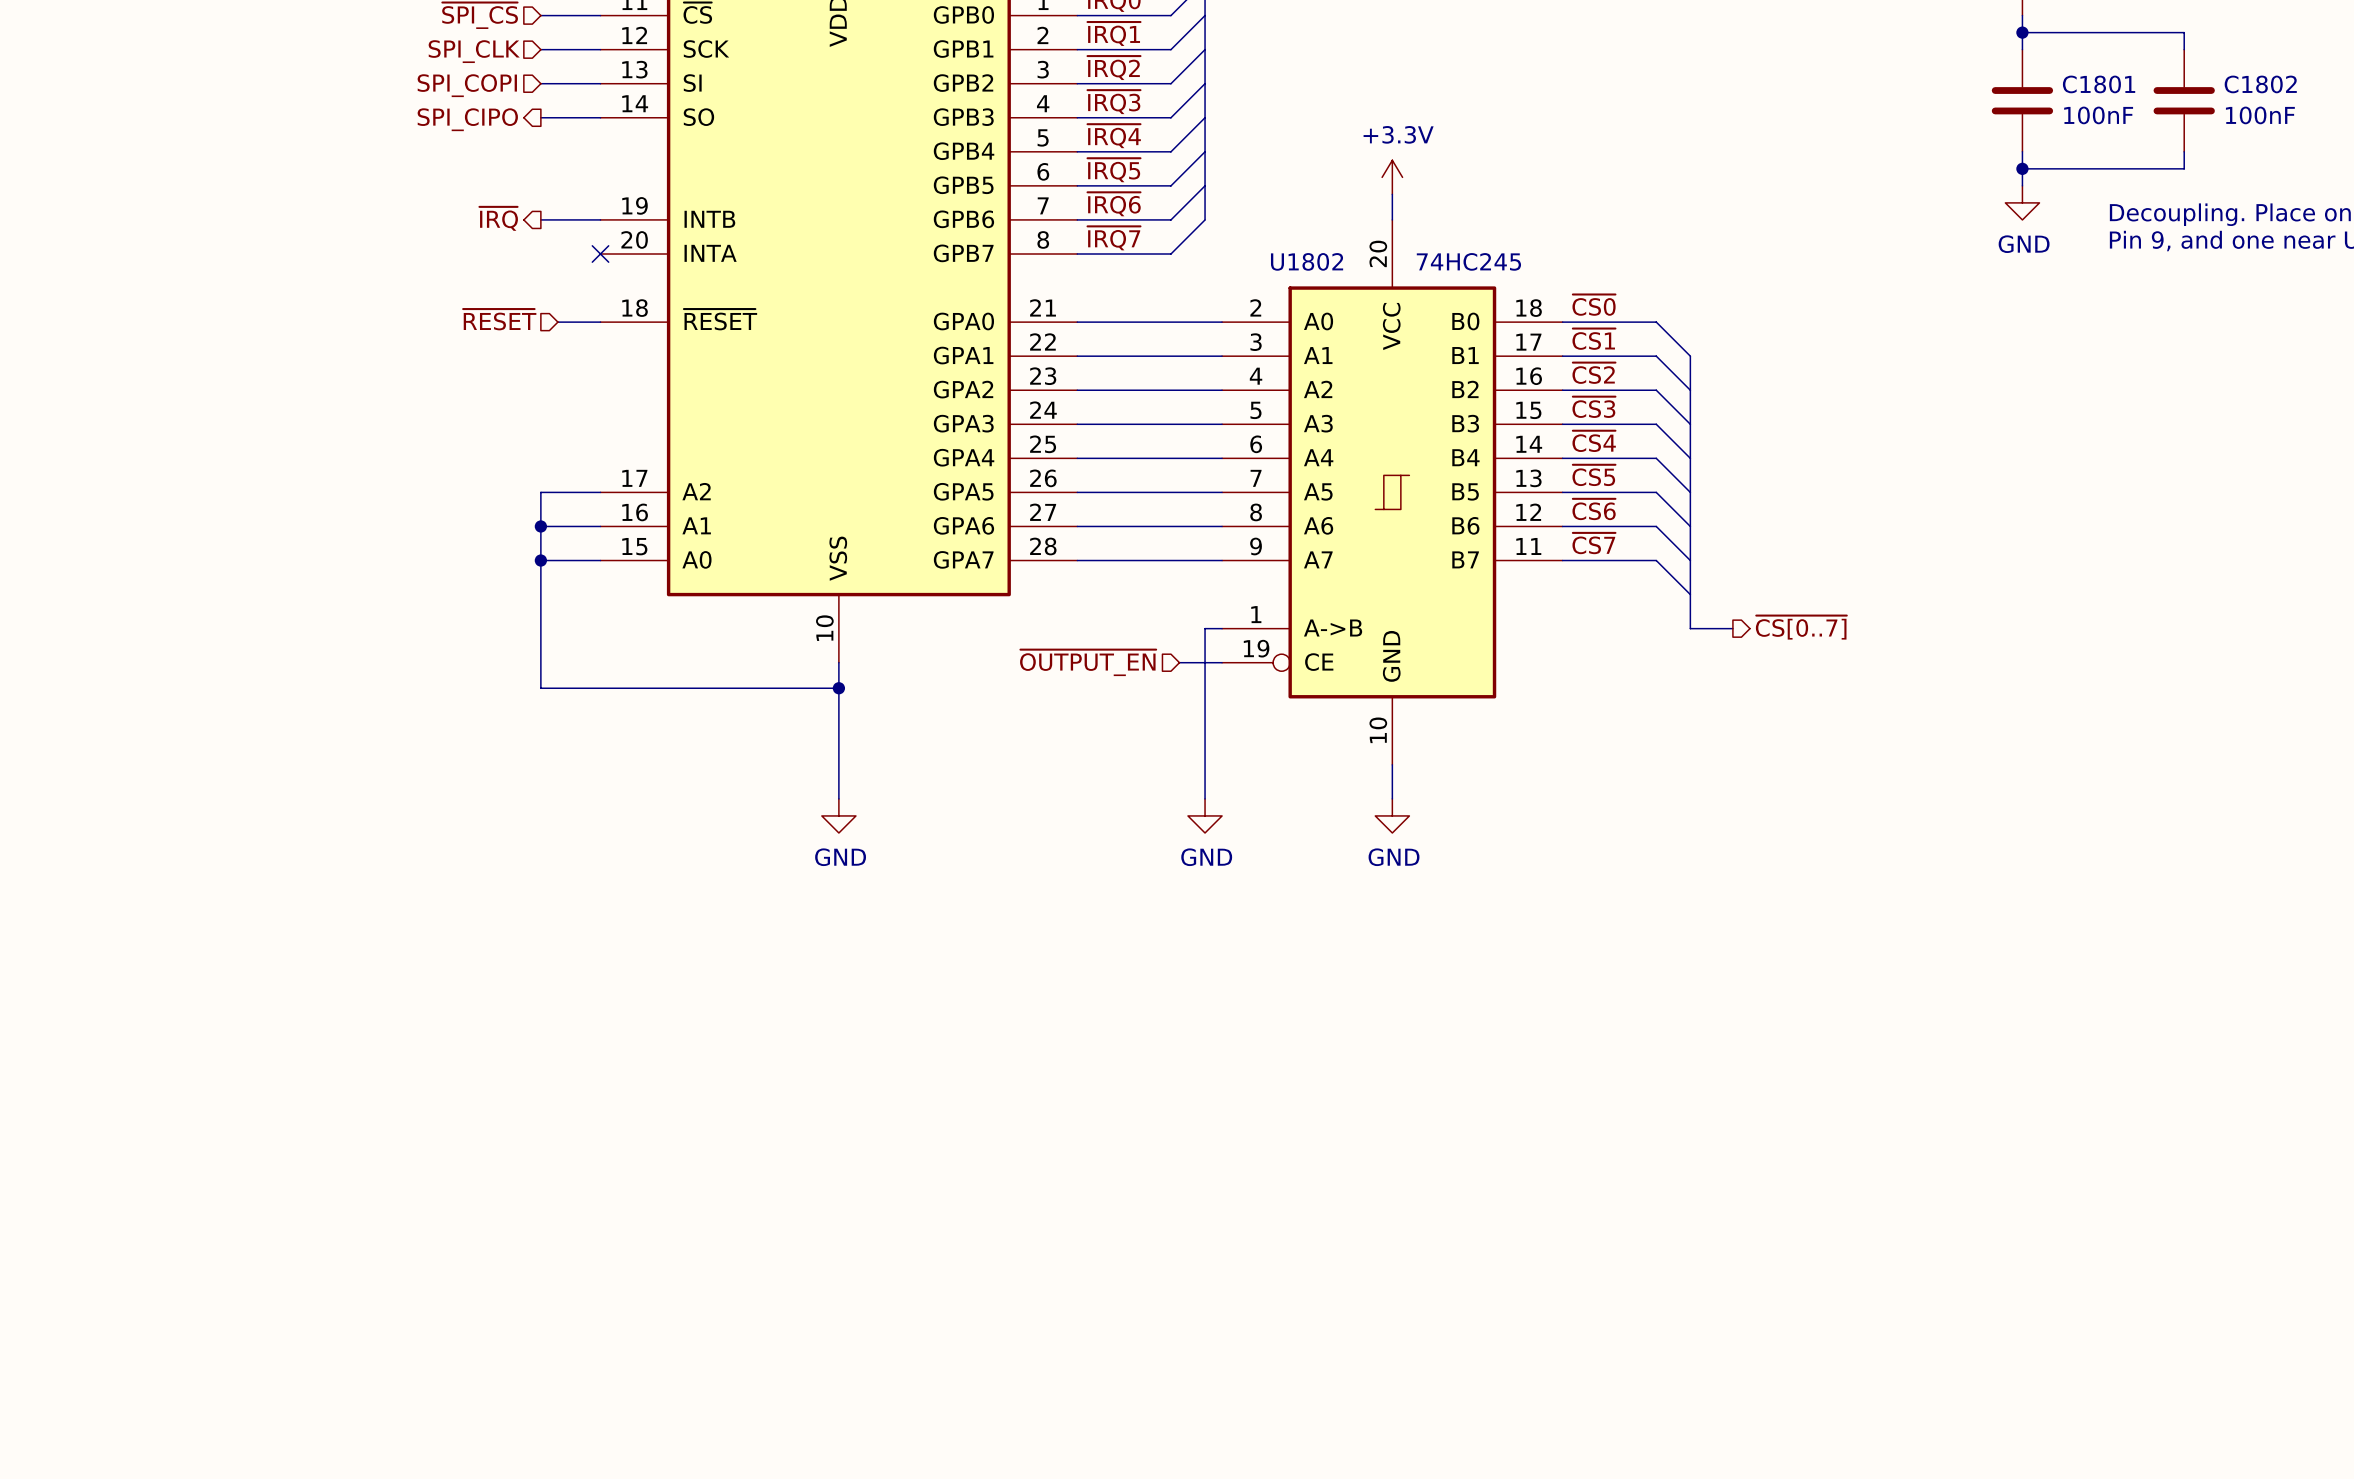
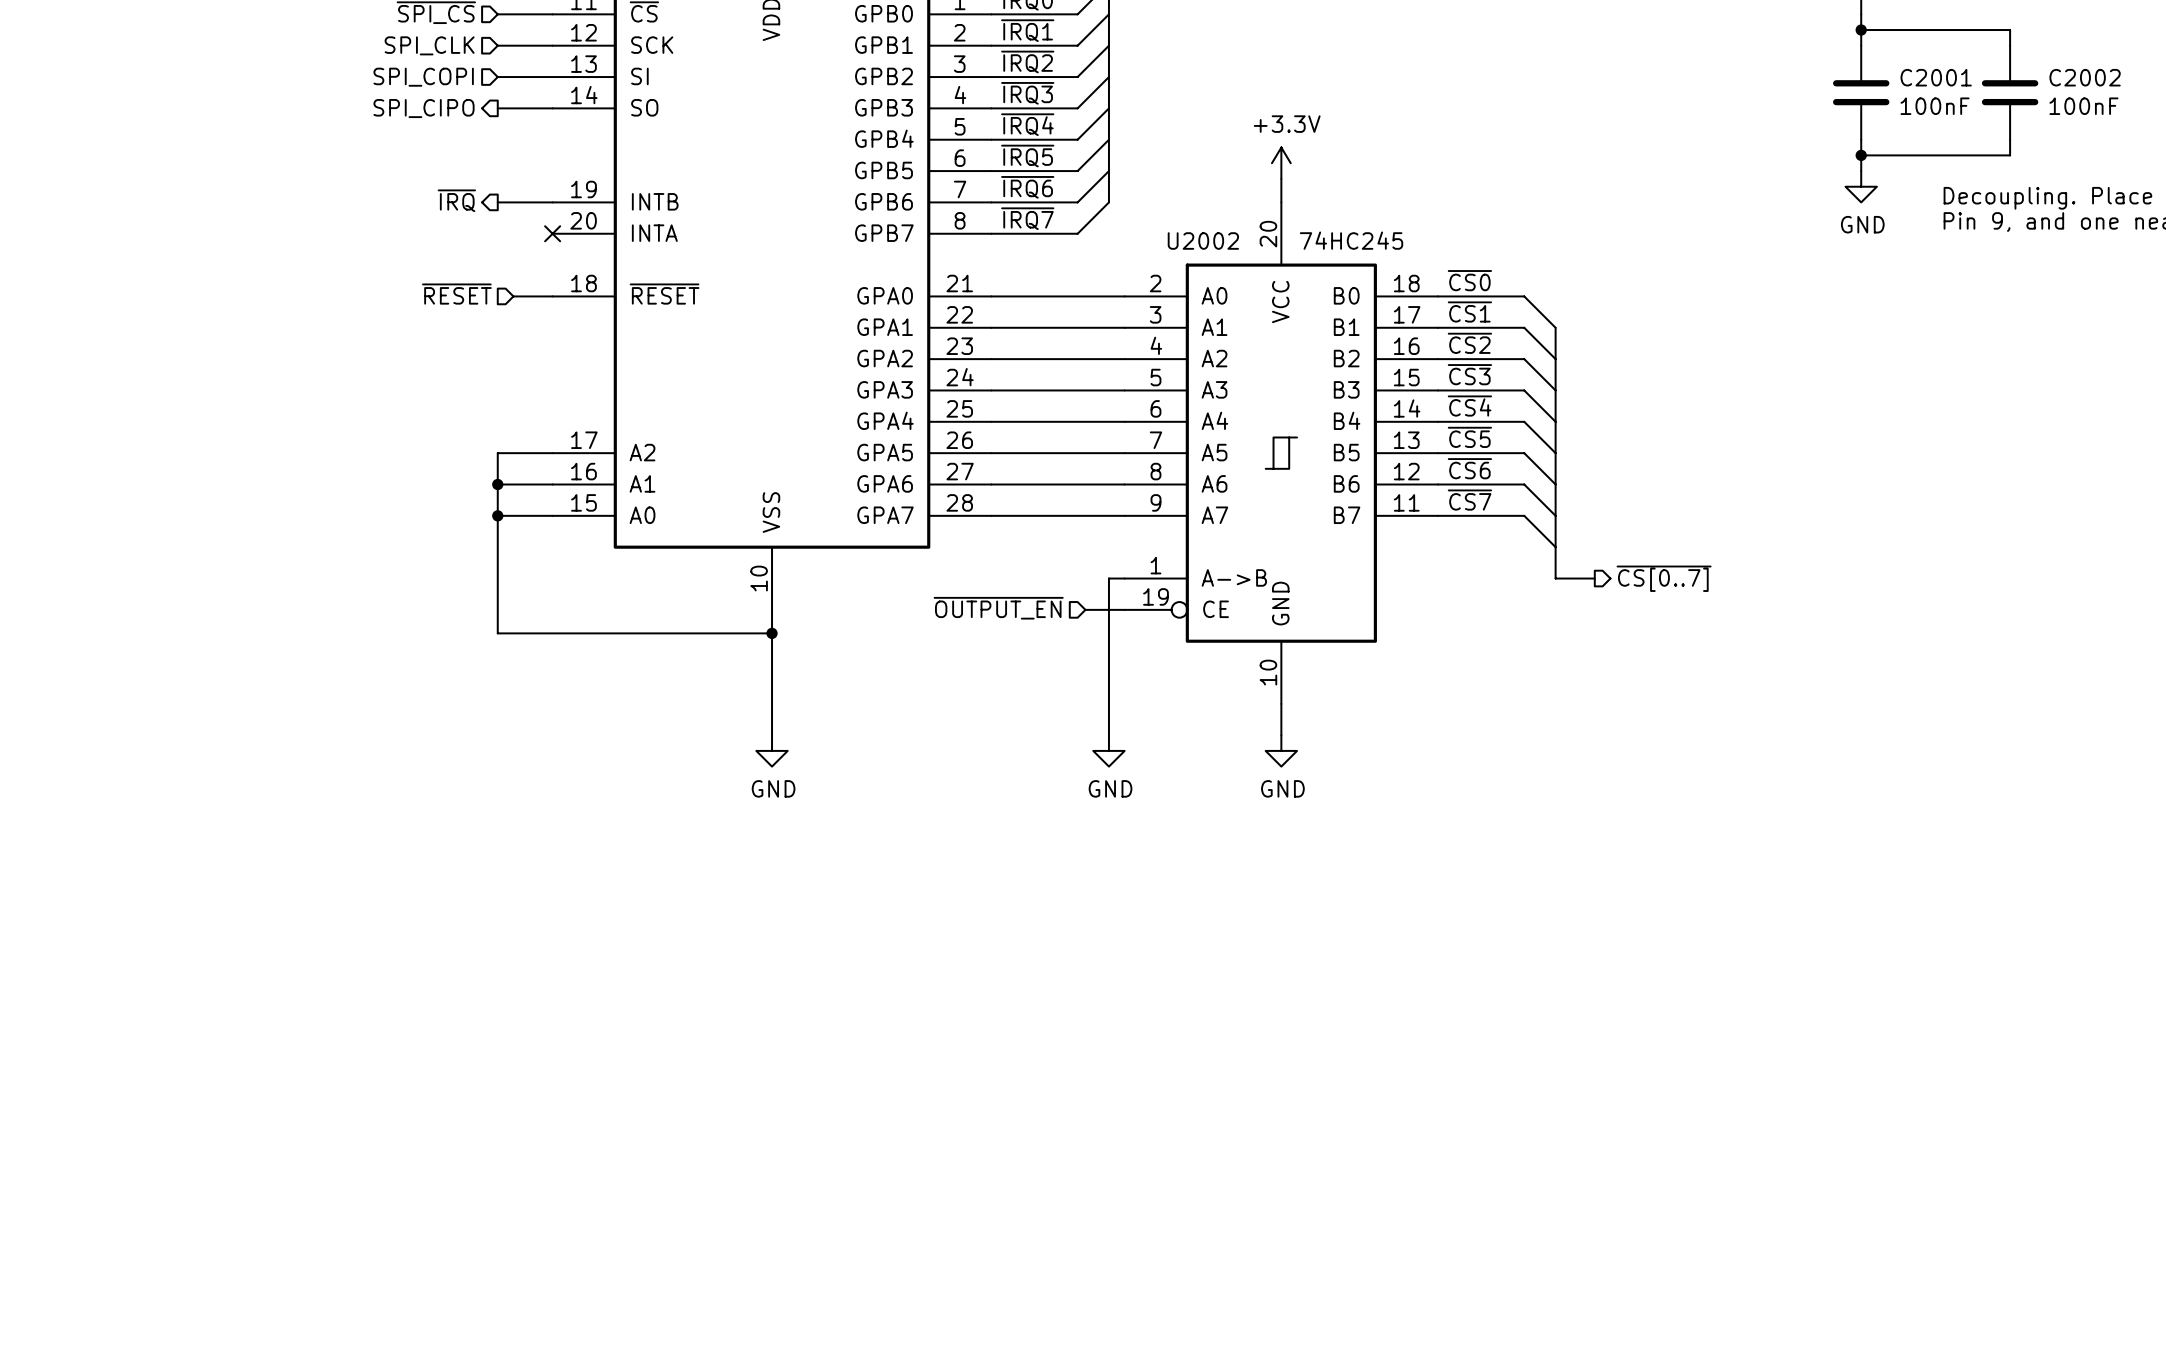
C1801 name: C1801 (2099, 84) -> C2001 (1936, 77)
C1802 name: C1802 (2260, 84) -> C2002 (2085, 77)
U1802 name: U1802 (1307, 261) -> U2002 (1203, 241)

